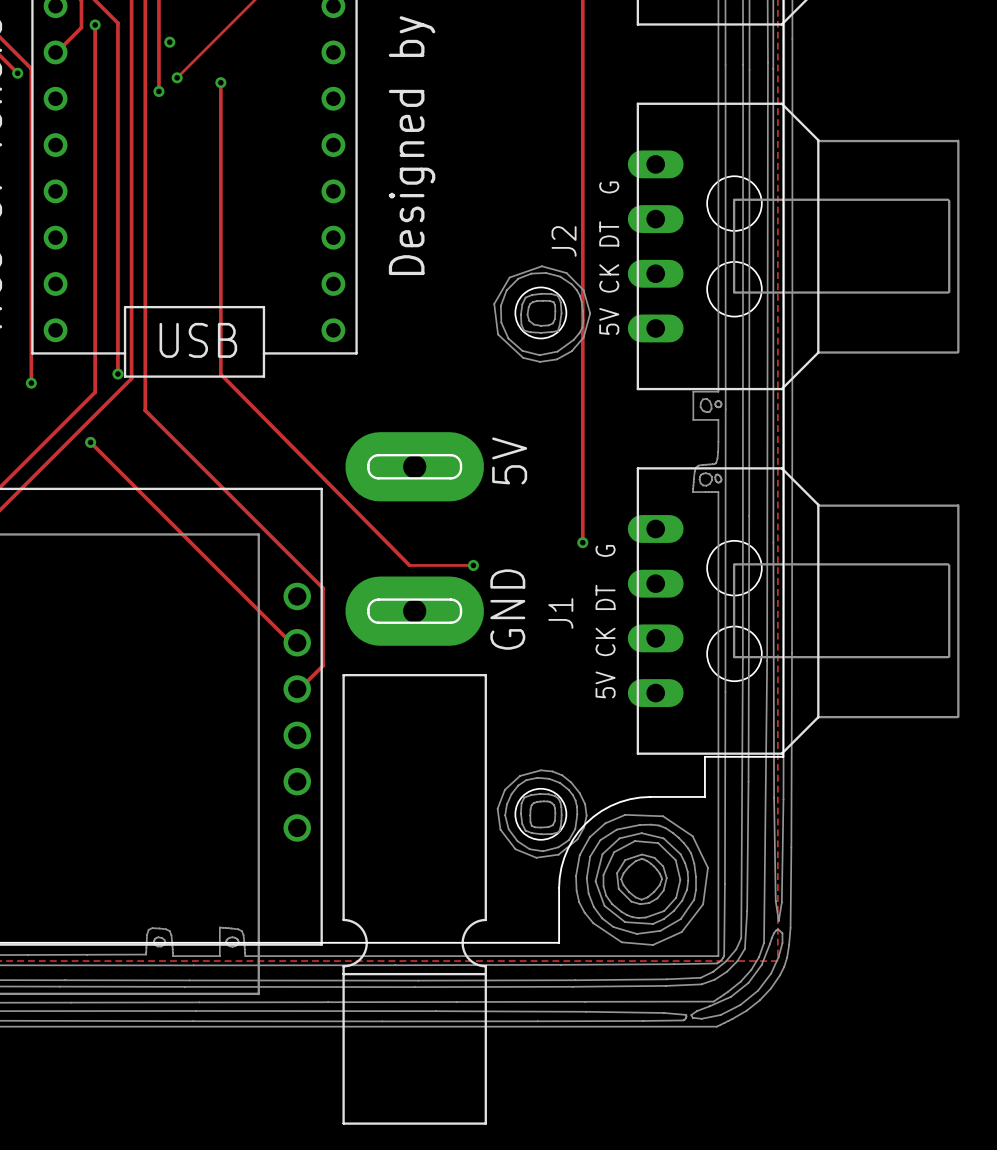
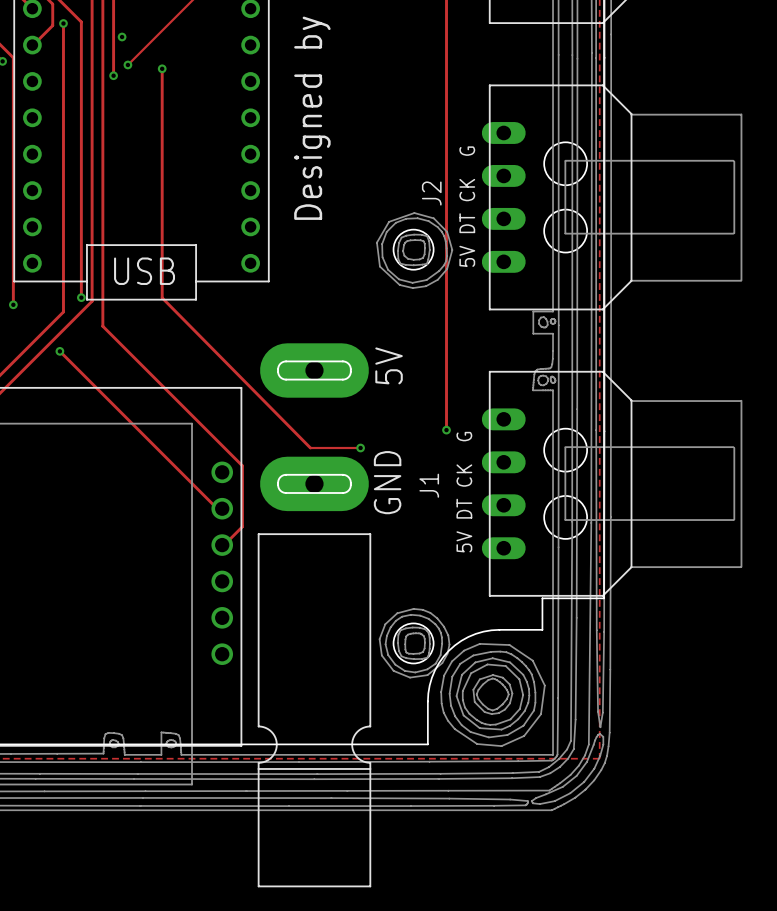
text: 5V CK DT G (609, 258) -> 5V DT CK G (467, 206)
text: 5V CK DT G (605, 621) -> 5V DT CK G (464, 492)

